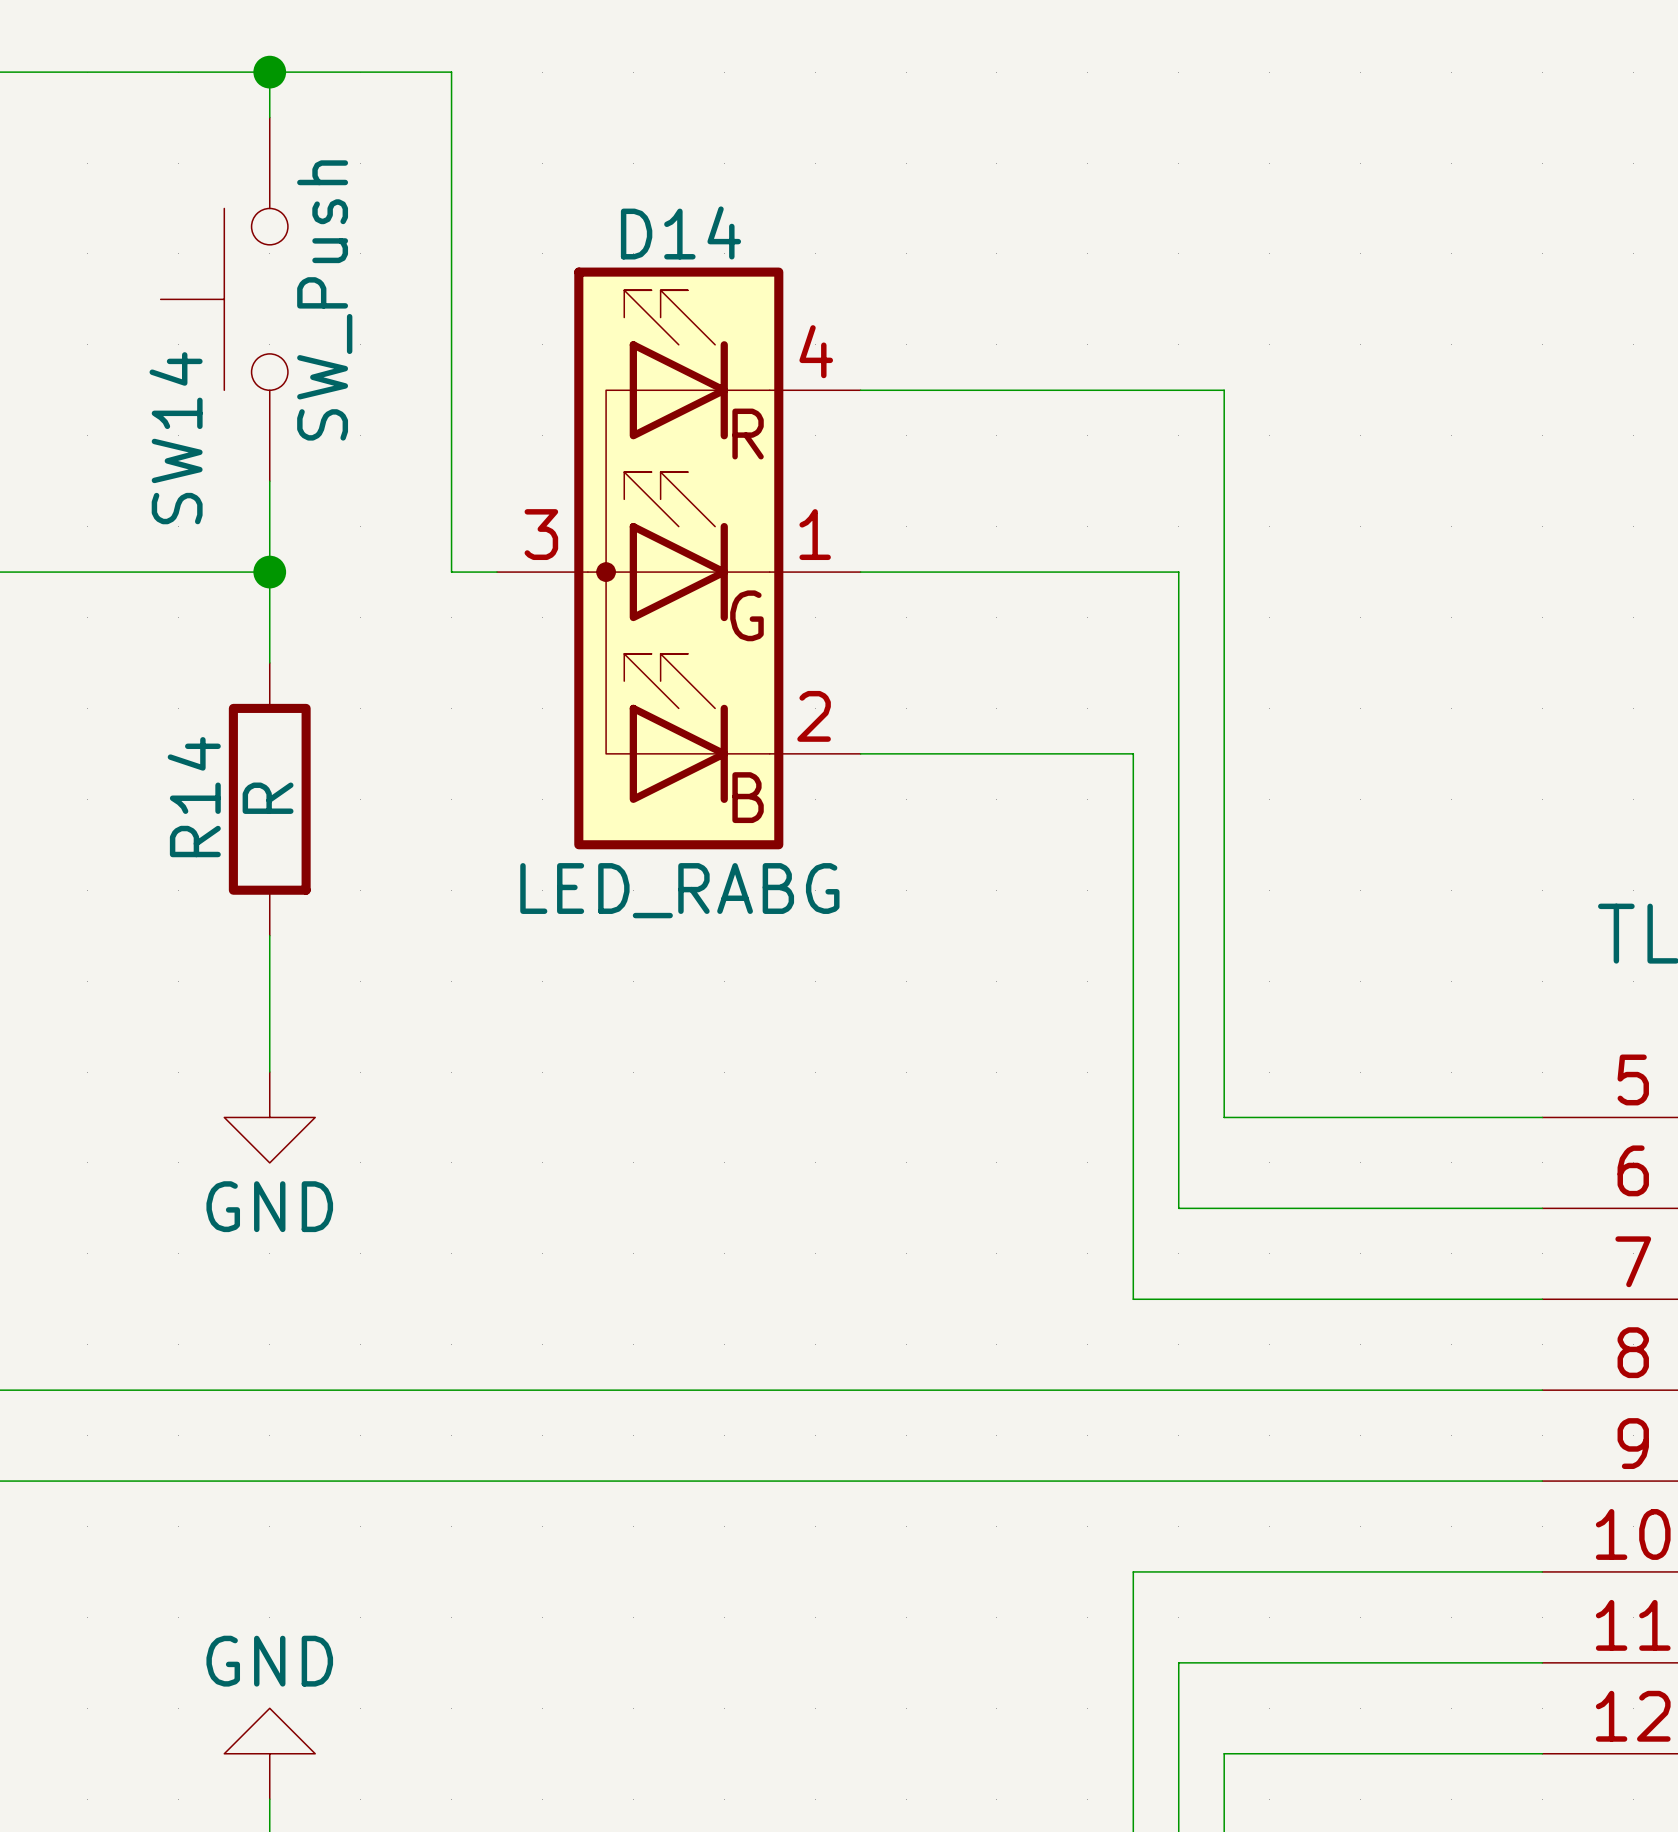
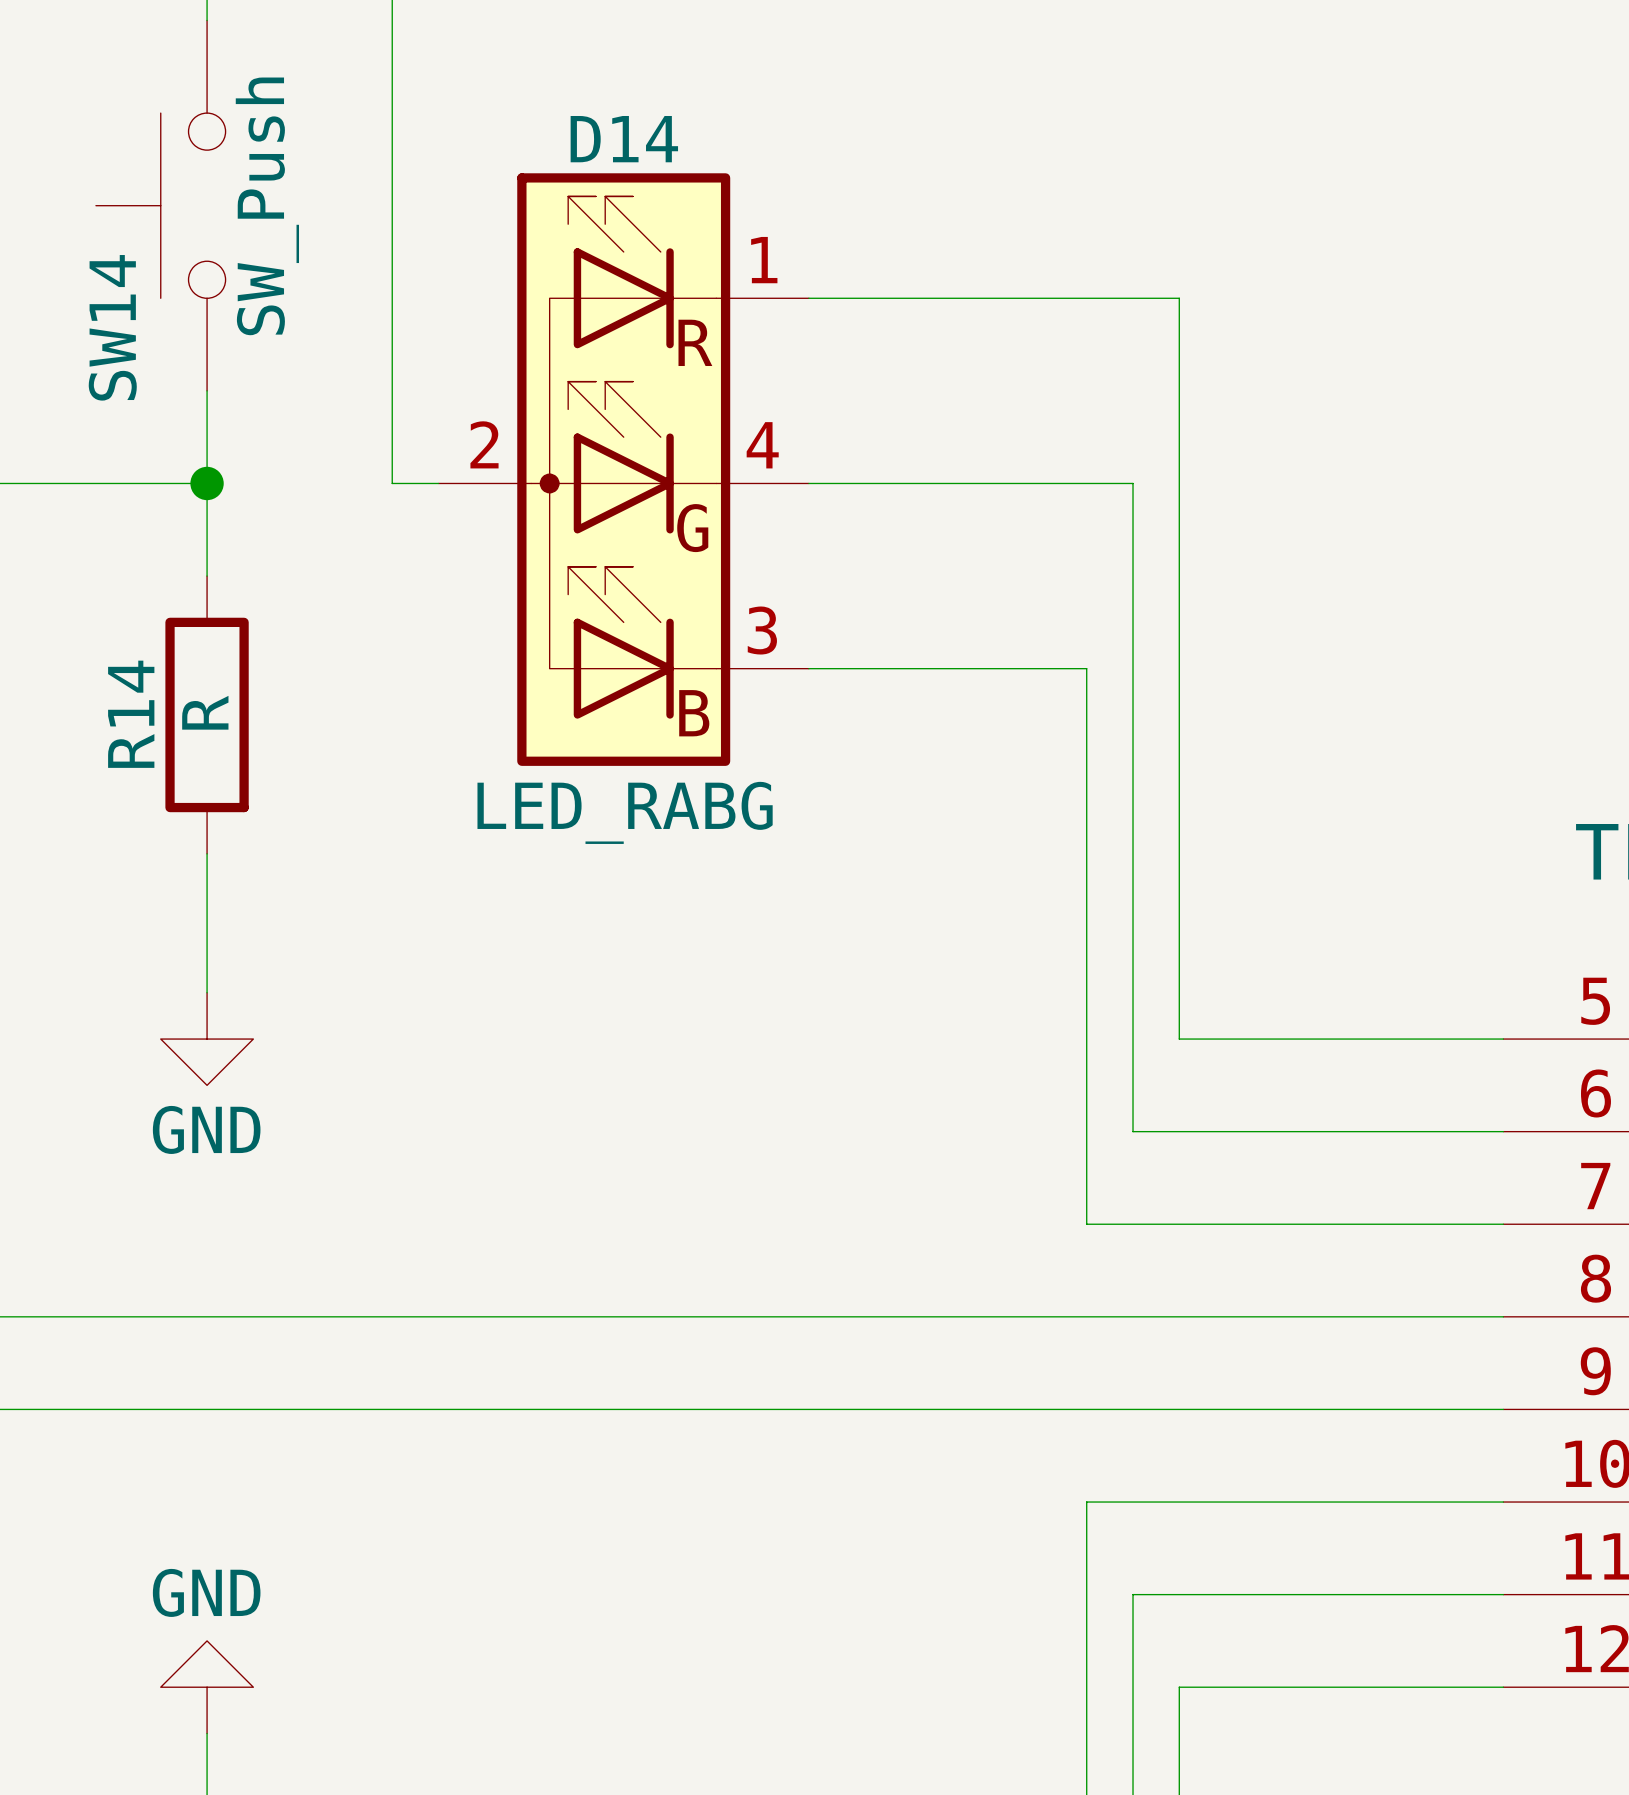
D14 pin number: 4 (816, 351) -> 1 (764, 260)
D14 pin number: 3 (541, 534) -> 2 (484, 444)
D14 pin number: 1 (815, 534) -> 4 (762, 445)
D14 pin number: 2 (814, 716) -> 3 (762, 630)

